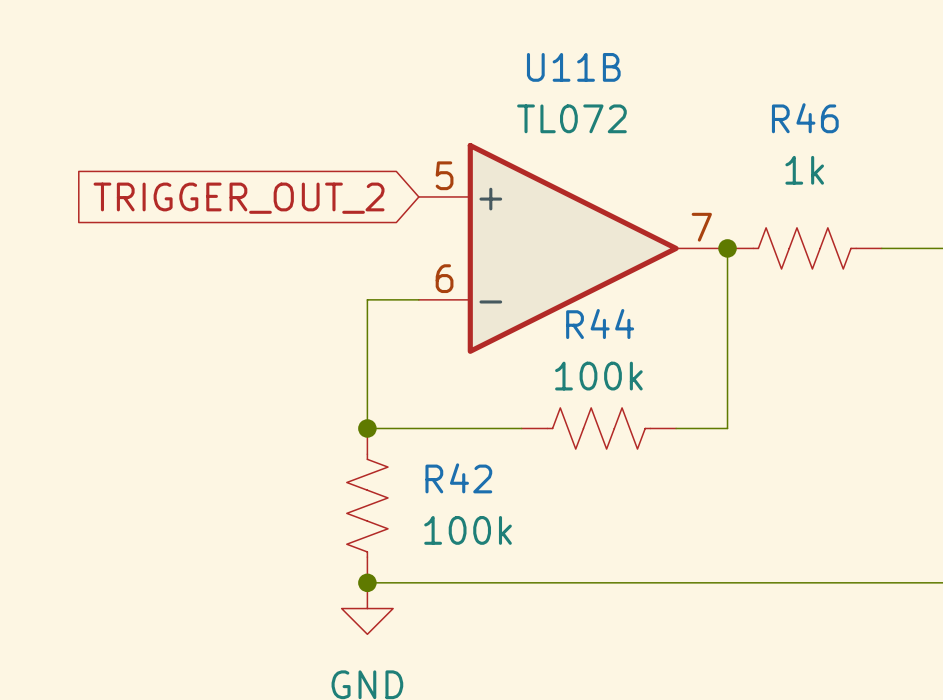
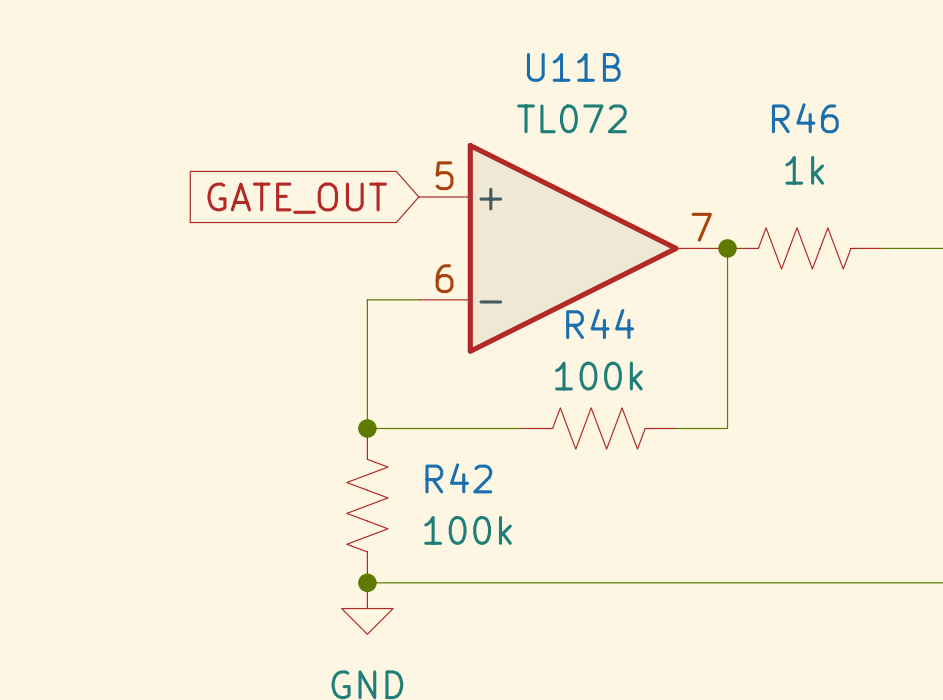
global label: TRIGGER_OUT_2 (239, 198) -> GATE_OUT (297, 198)

